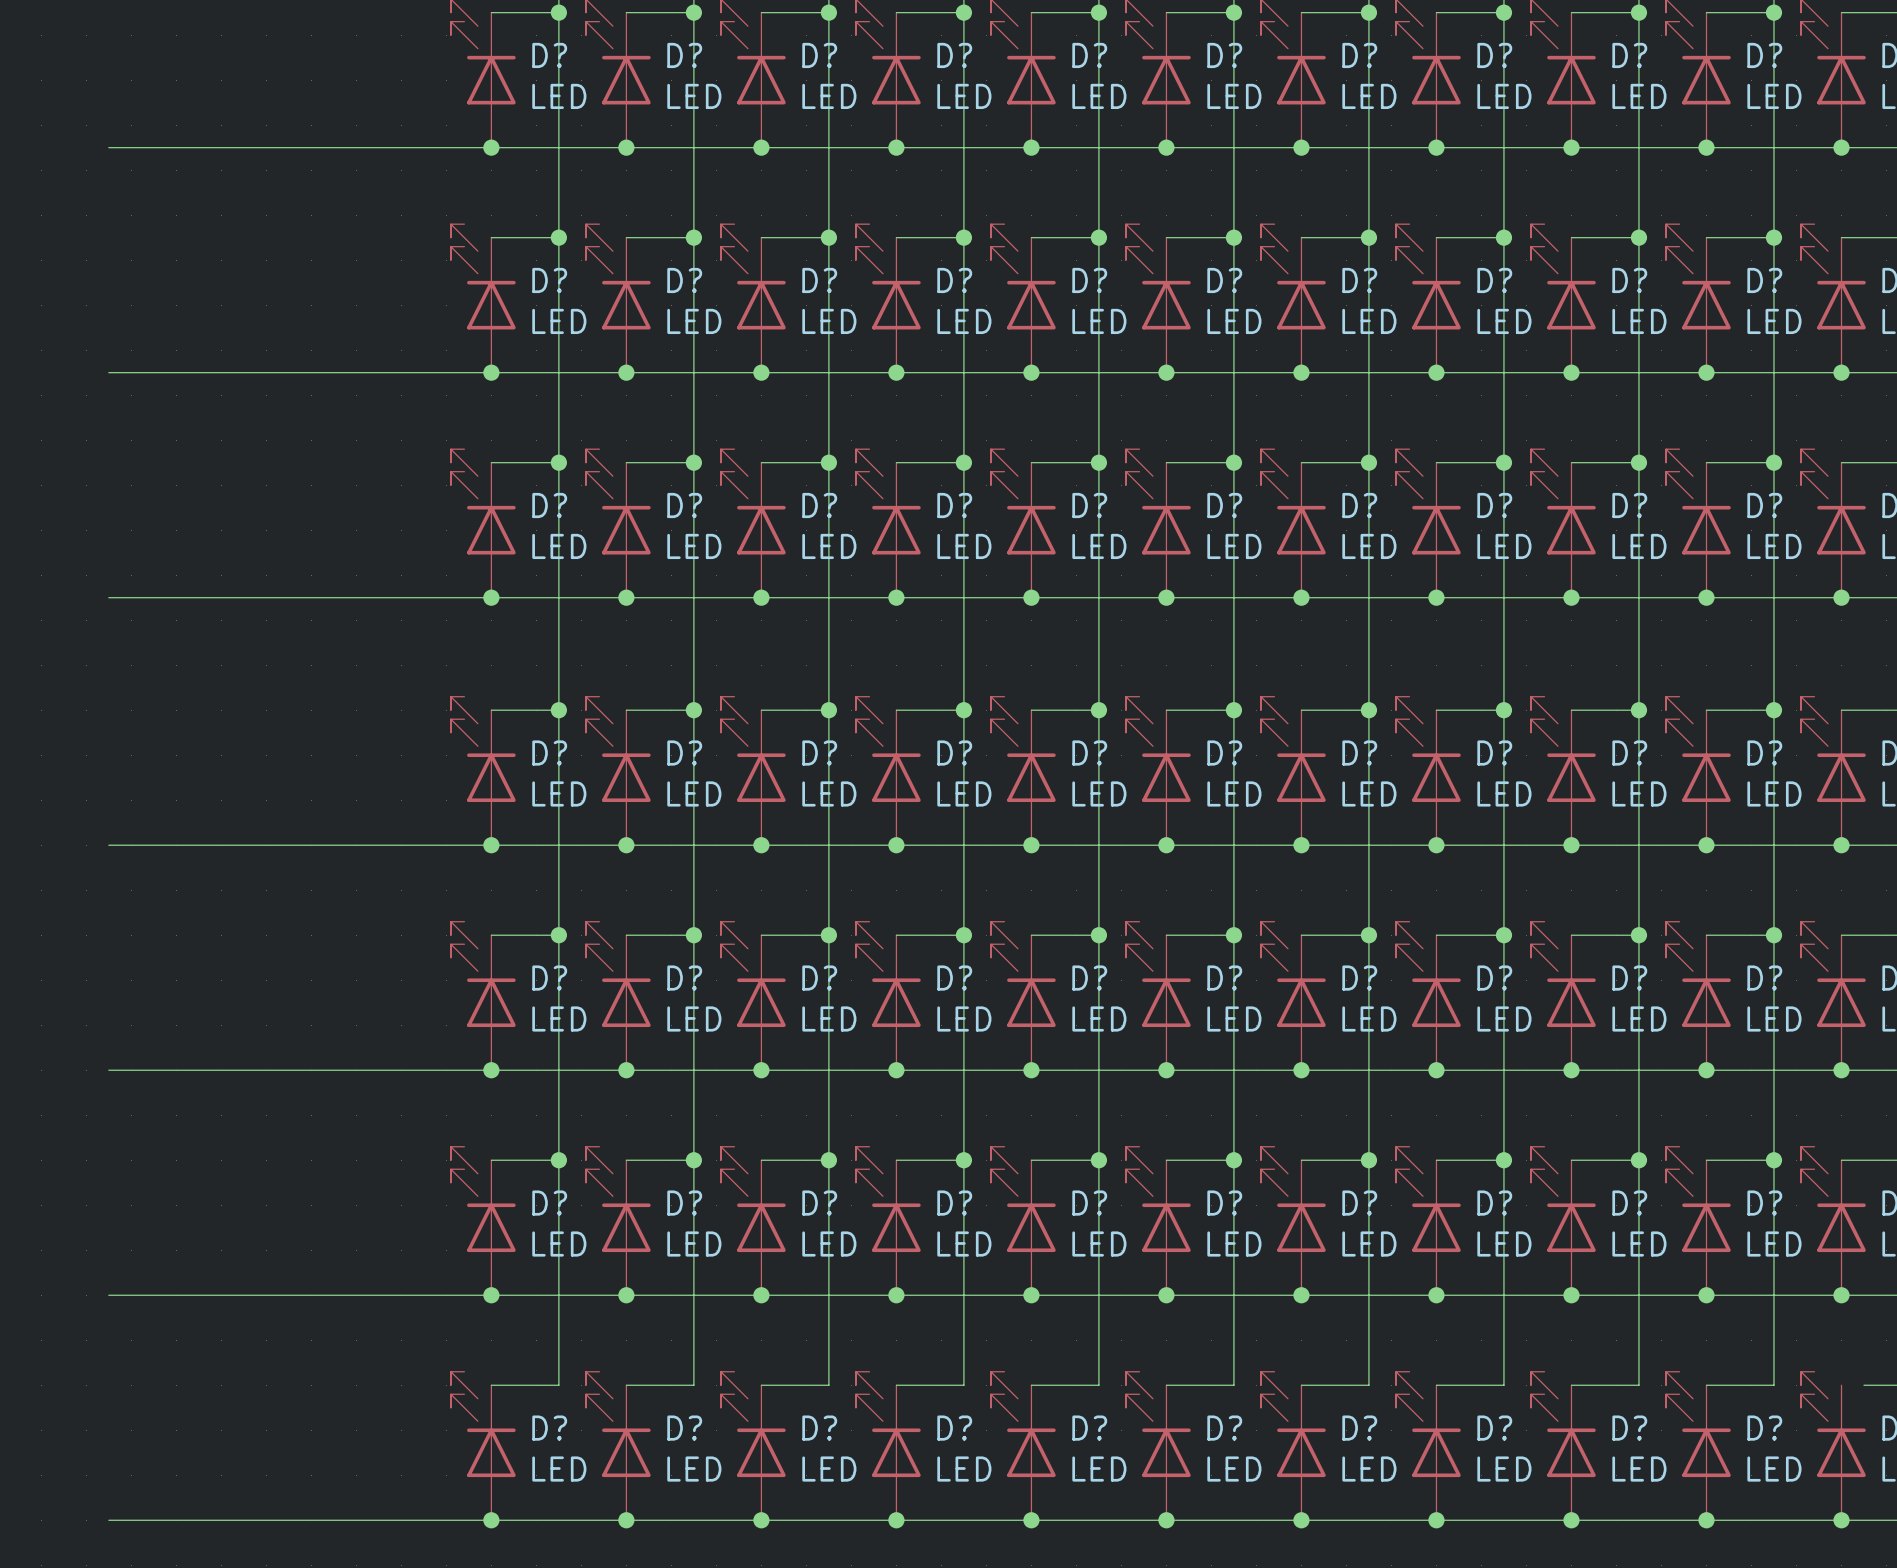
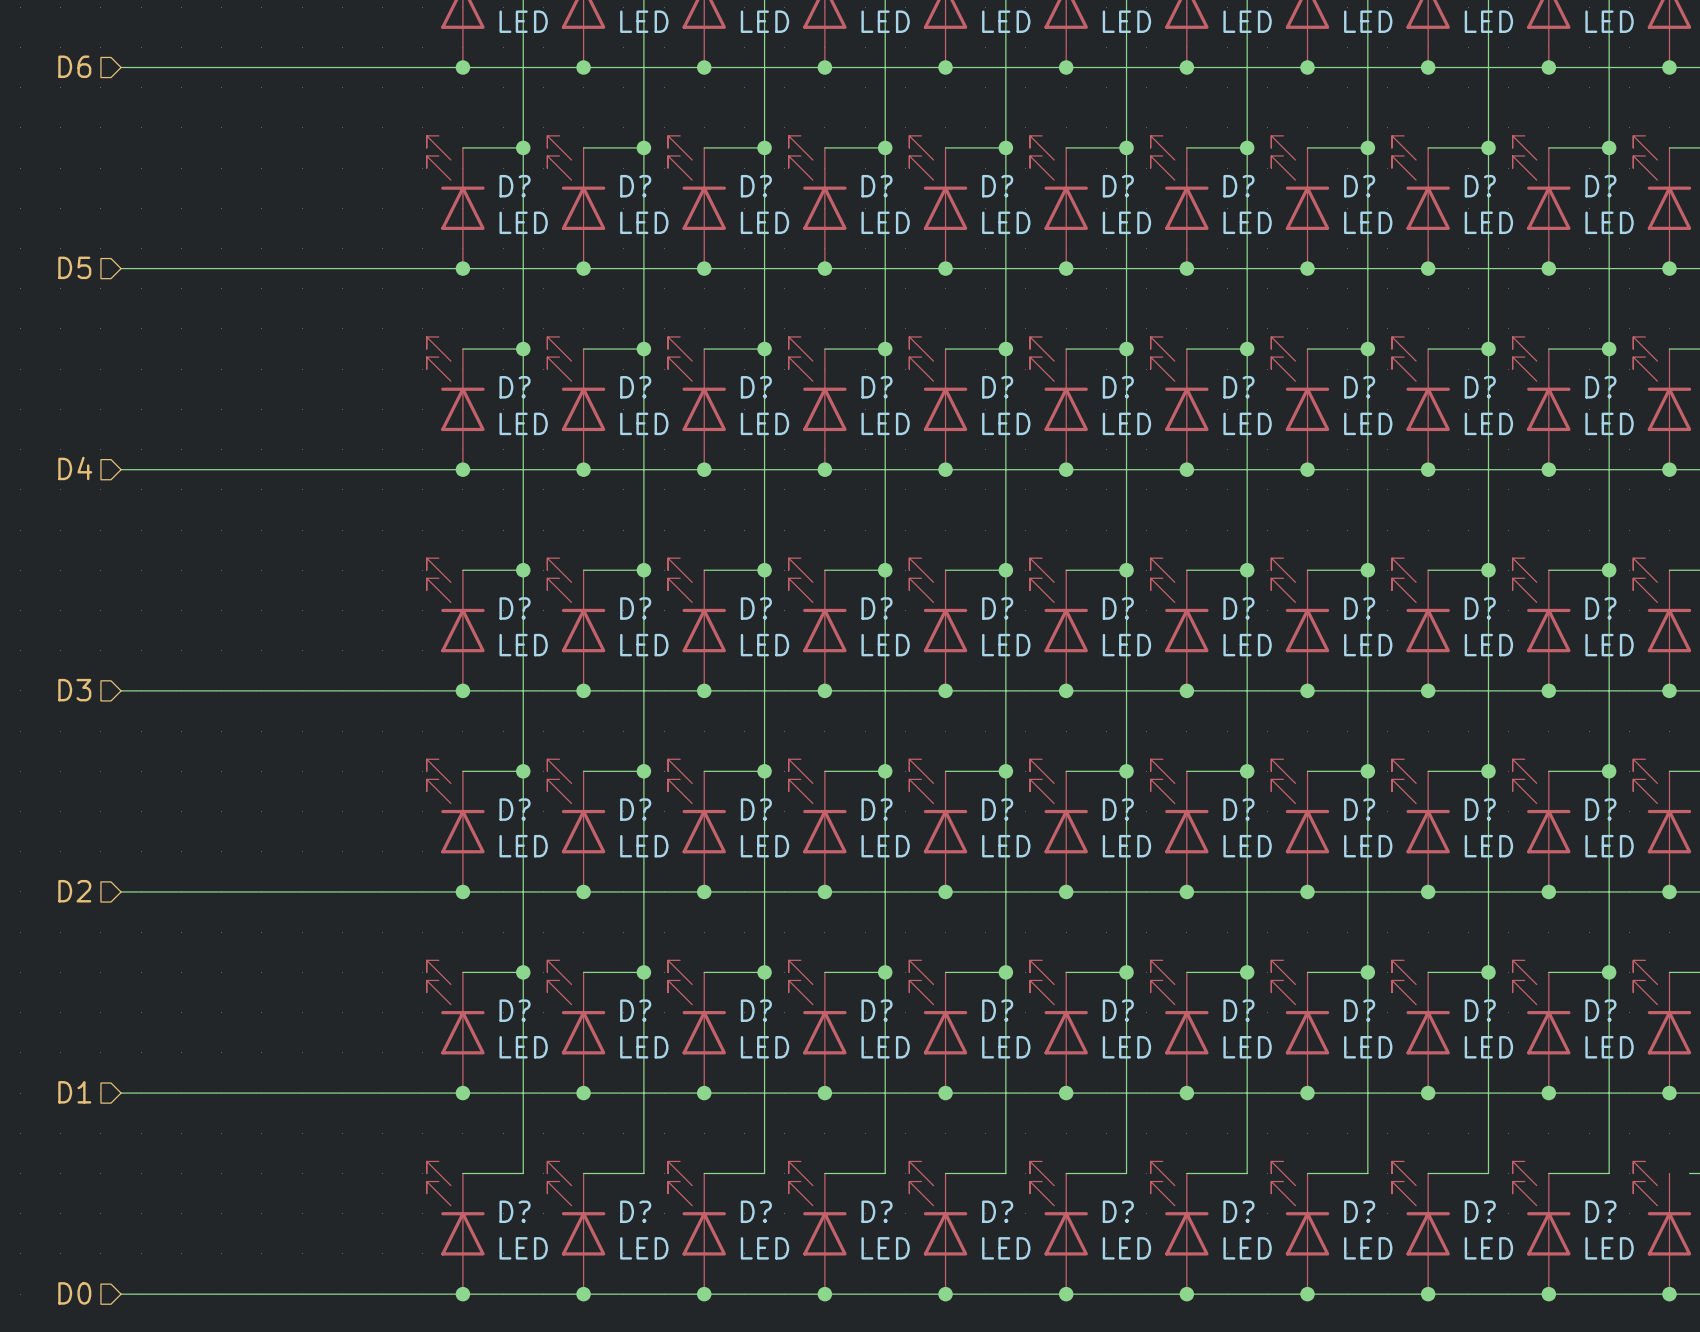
hierarchical label: none -> D6 (74, 66)
hierarchical label: none -> D5 (74, 267)
hierarchical label: none -> D4 (75, 468)
hierarchical label: none -> D3 (74, 690)
hierarchical label: none -> D2 (74, 891)
hierarchical label: none -> D1 (74, 1092)
hierarchical label: none -> D0 (74, 1293)

